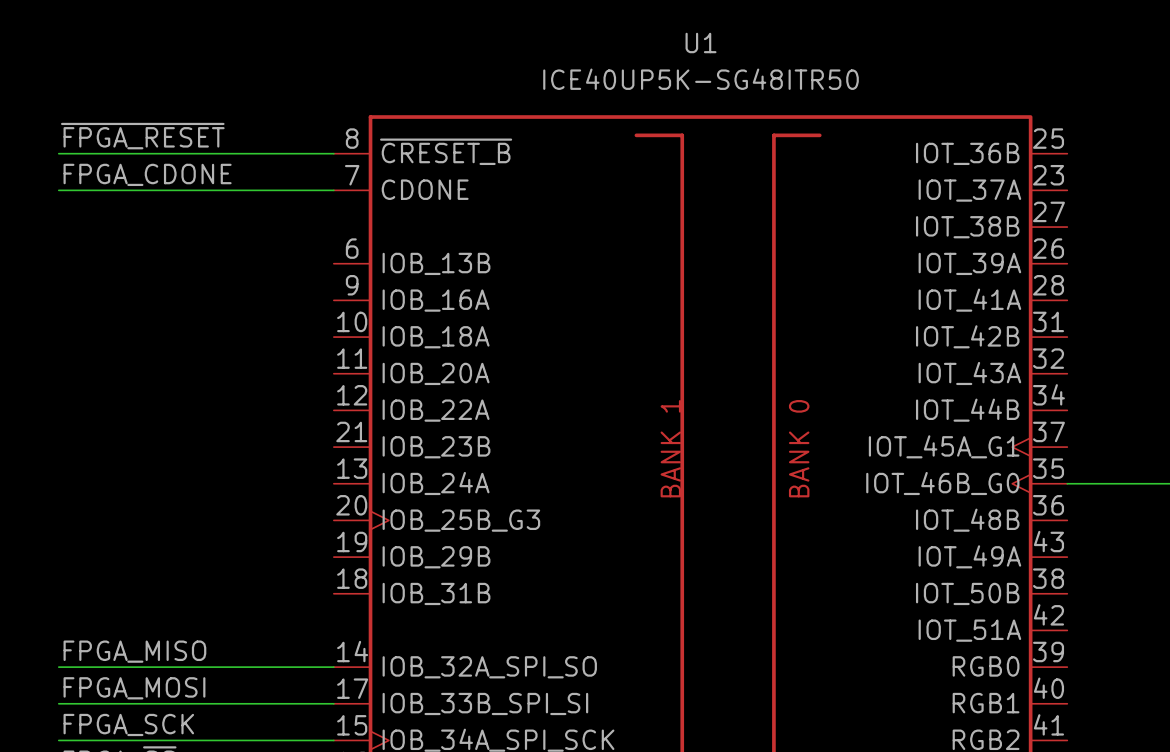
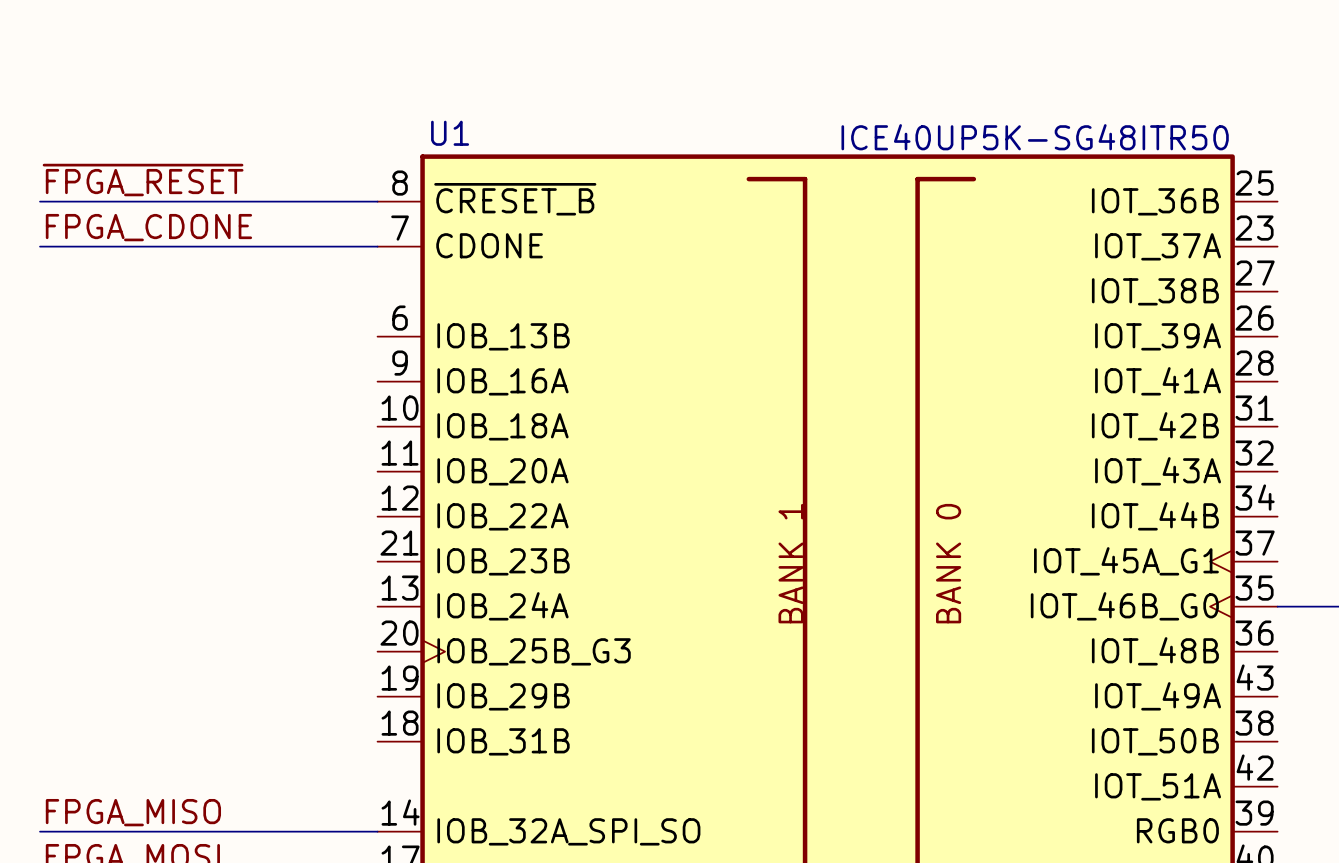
U1 name position: U1 (701, 42) -> U1 (450, 133)
U1 text position: ICE40UP5K-SG48ITR50 (701, 79) -> ICE40UP5K-SG48ITR50 (1035, 137)

